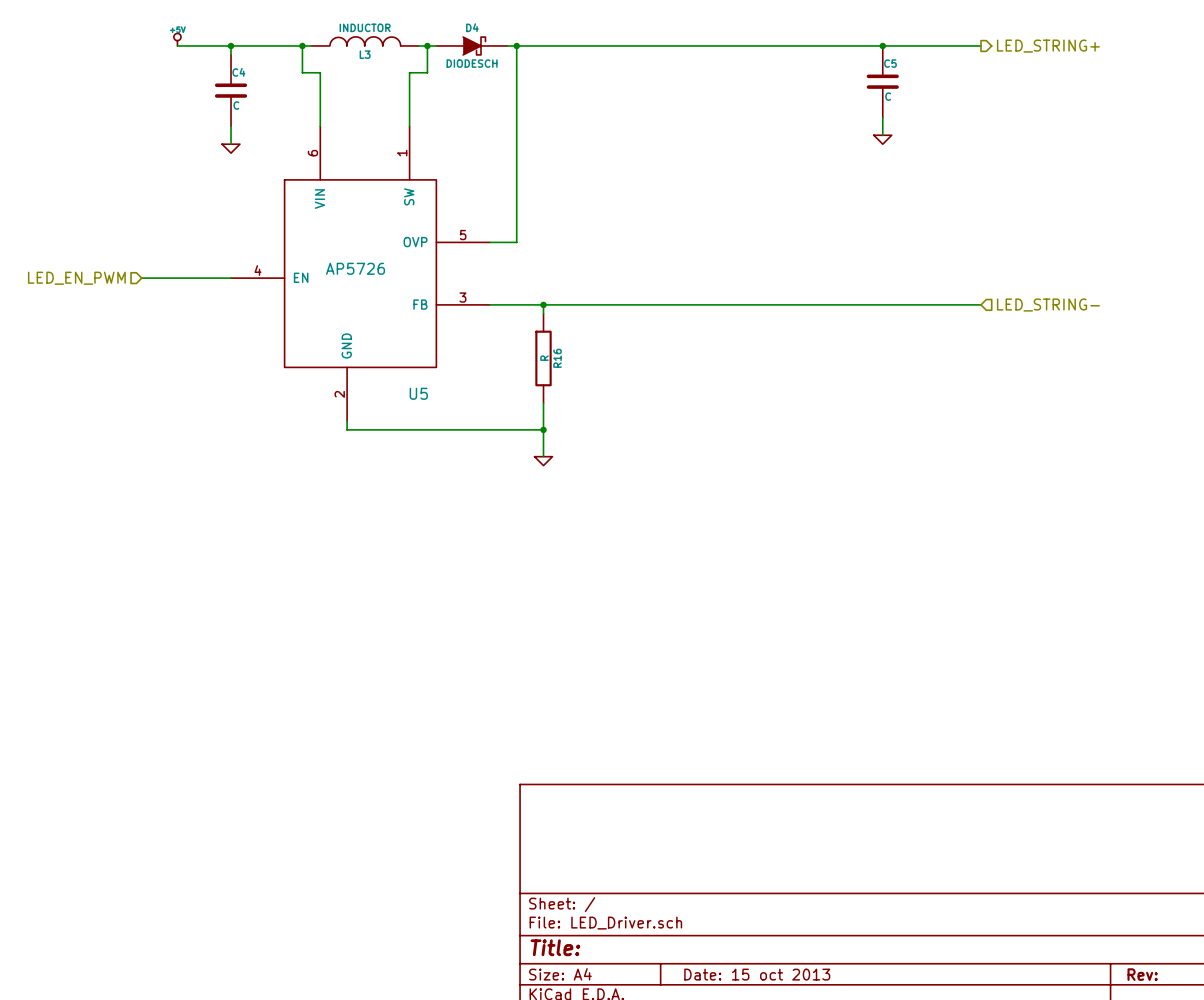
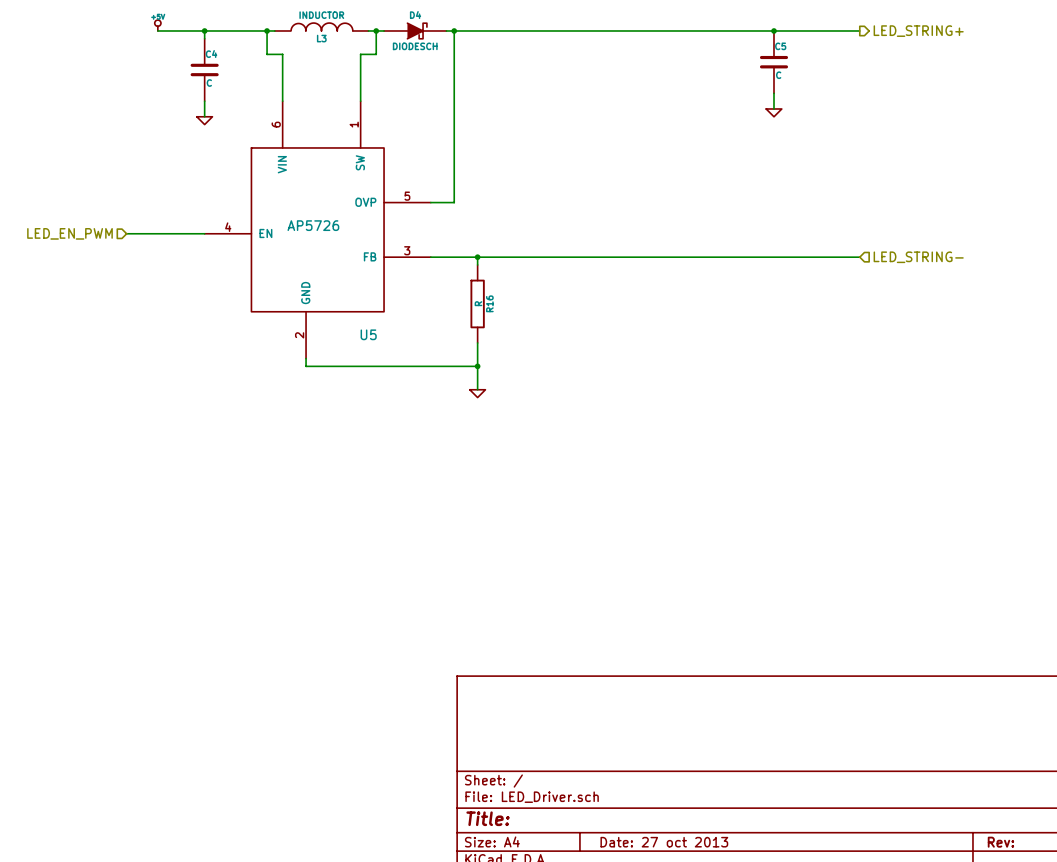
title block: Date: 15 oct 2013 (757, 974) -> Date: 27 oct 2013 (664, 842)

